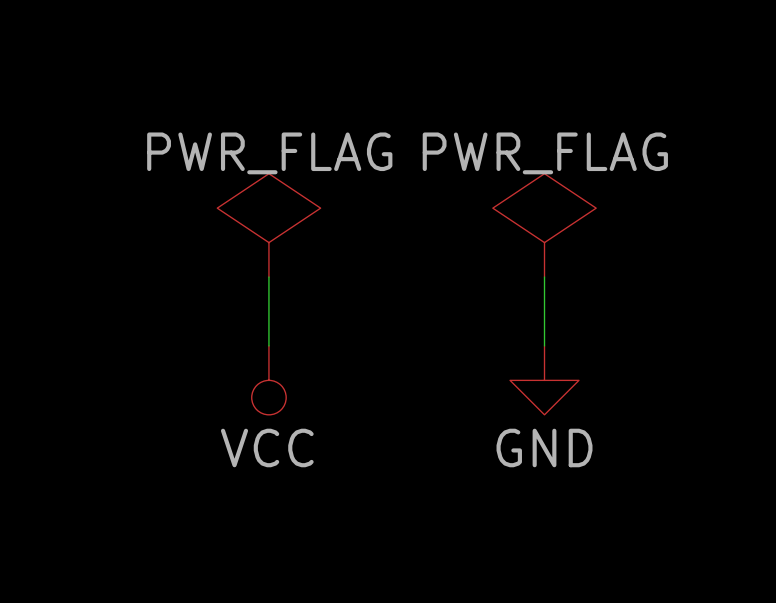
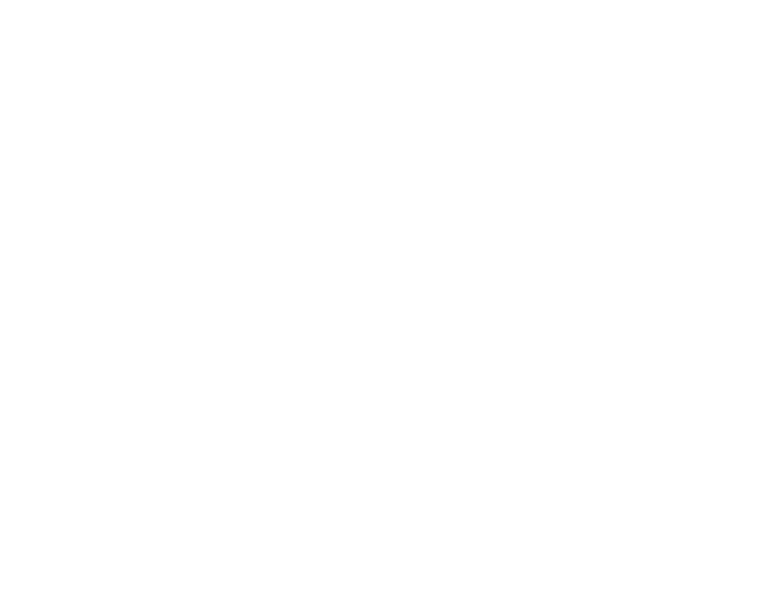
power symbol: PWR_FLAG (268, 225) -> none
power symbol: PWR_FLAG (544, 225) -> none
wire: (268, 277) (268, 345) -> none
wire: (544, 277) (544, 345) -> none
power symbol: VCC (268, 380) -> none
power symbol: GND (544, 380) -> none

